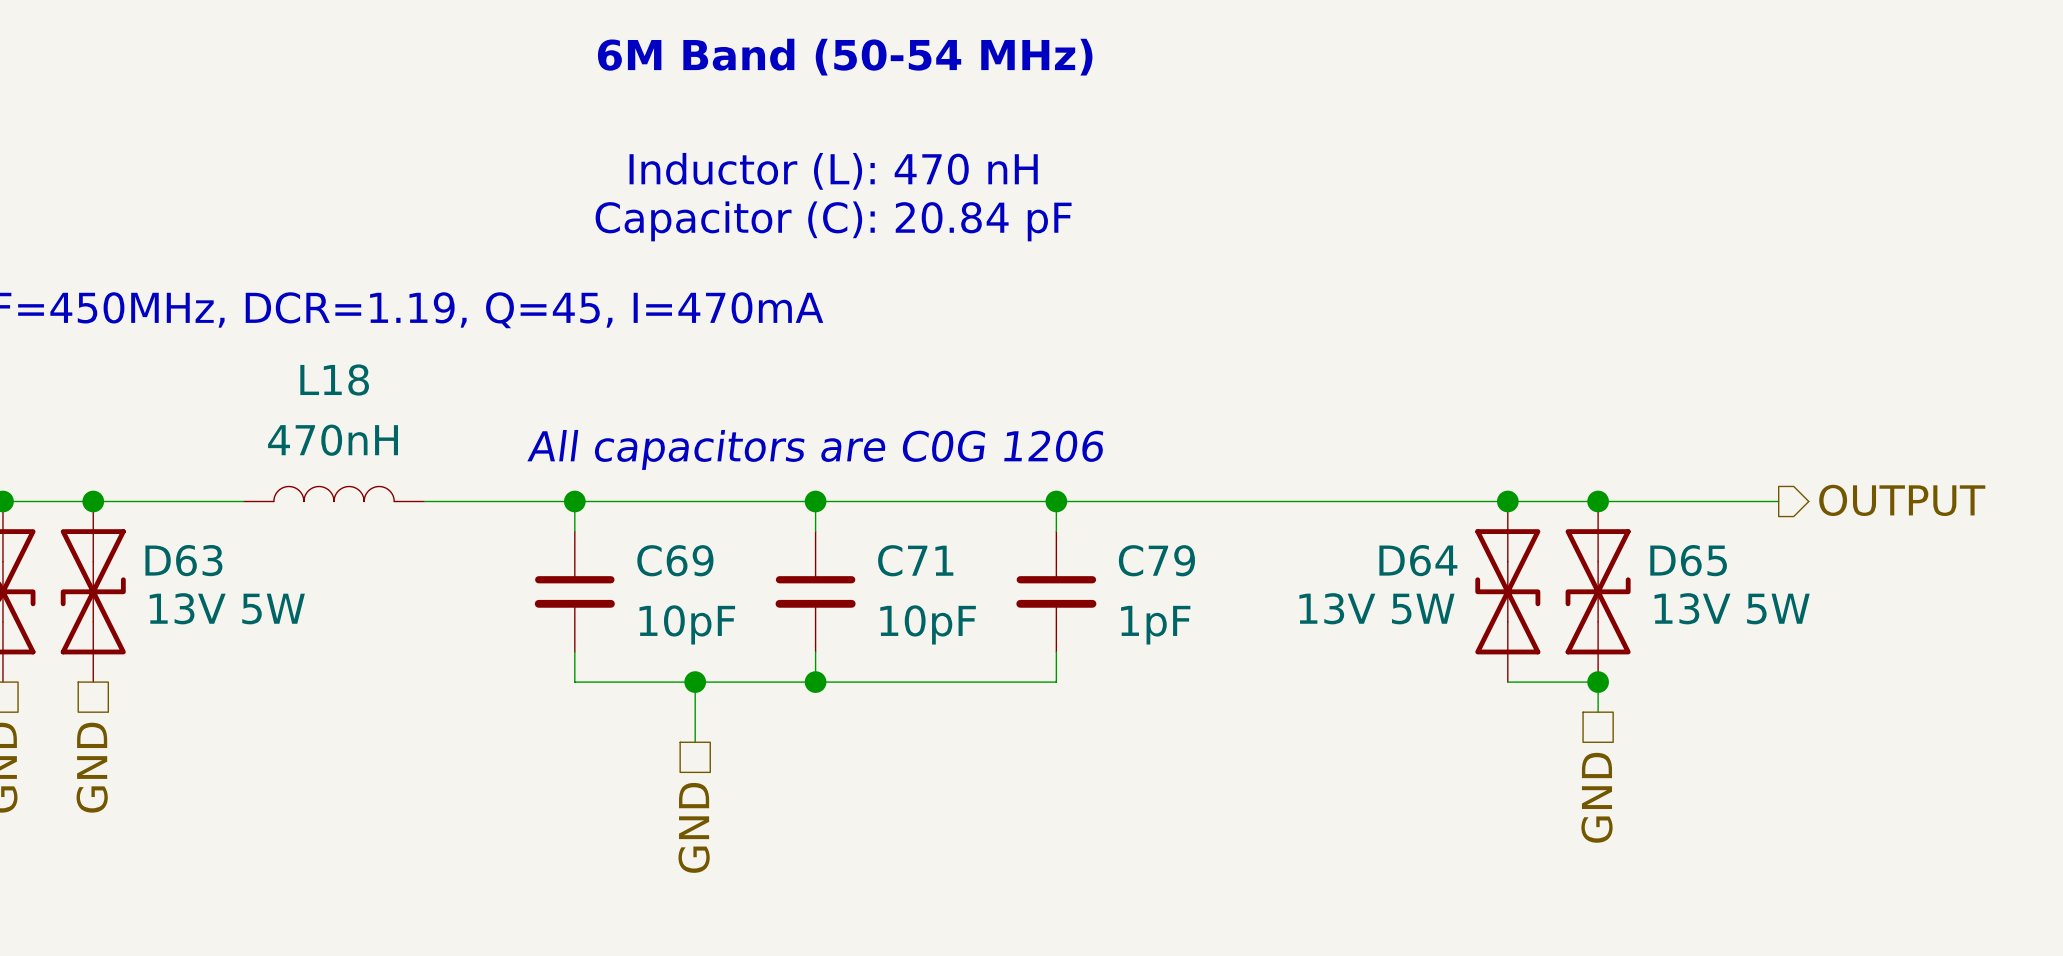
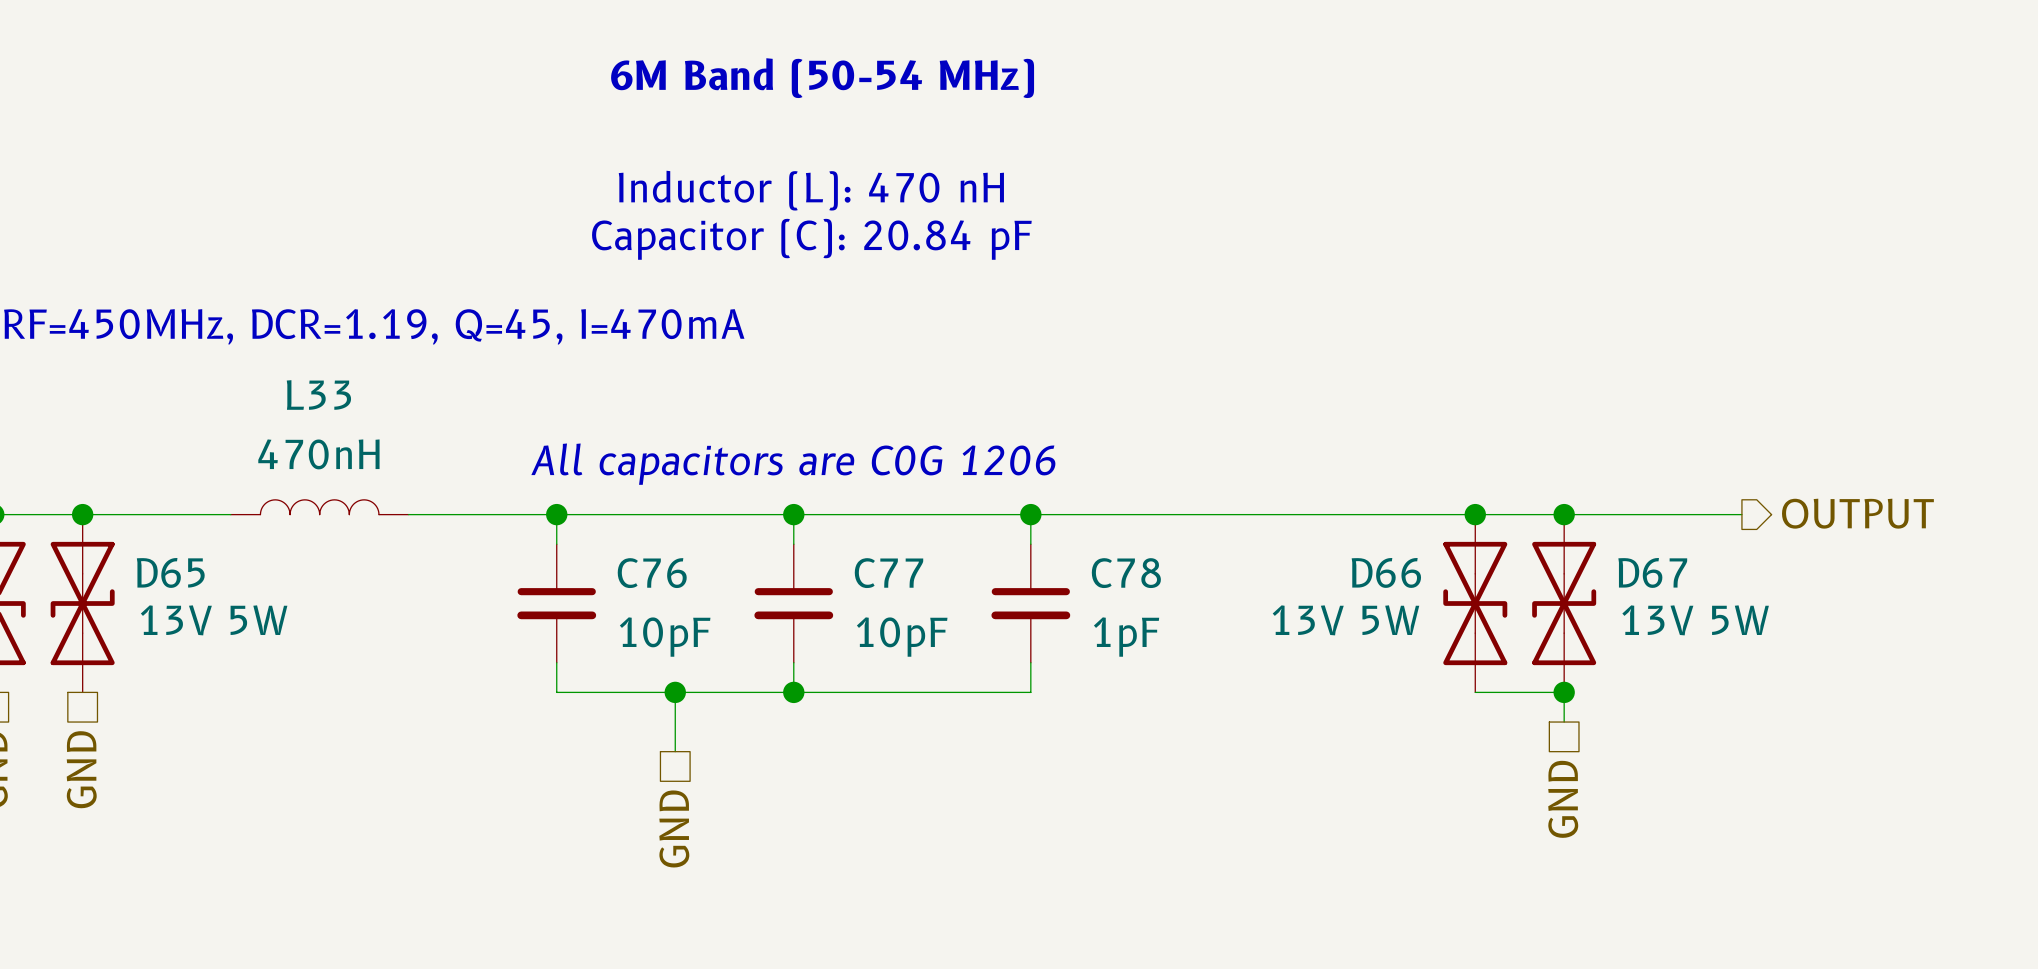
L18 name: L18 (334, 380) -> L33 (318, 394)
D63 name: D63 (183, 560) -> D65 (170, 572)
C69 name: C69 (675, 560) -> C76 (652, 573)
C71 name: C71 (915, 560) -> C77 (889, 573)
C79 name: C79 (1156, 560) -> C78 (1126, 573)
D64 name: D64 (1418, 560) -> D66 (1386, 572)
D65 name: D65 (1688, 560) -> D67 (1652, 572)

